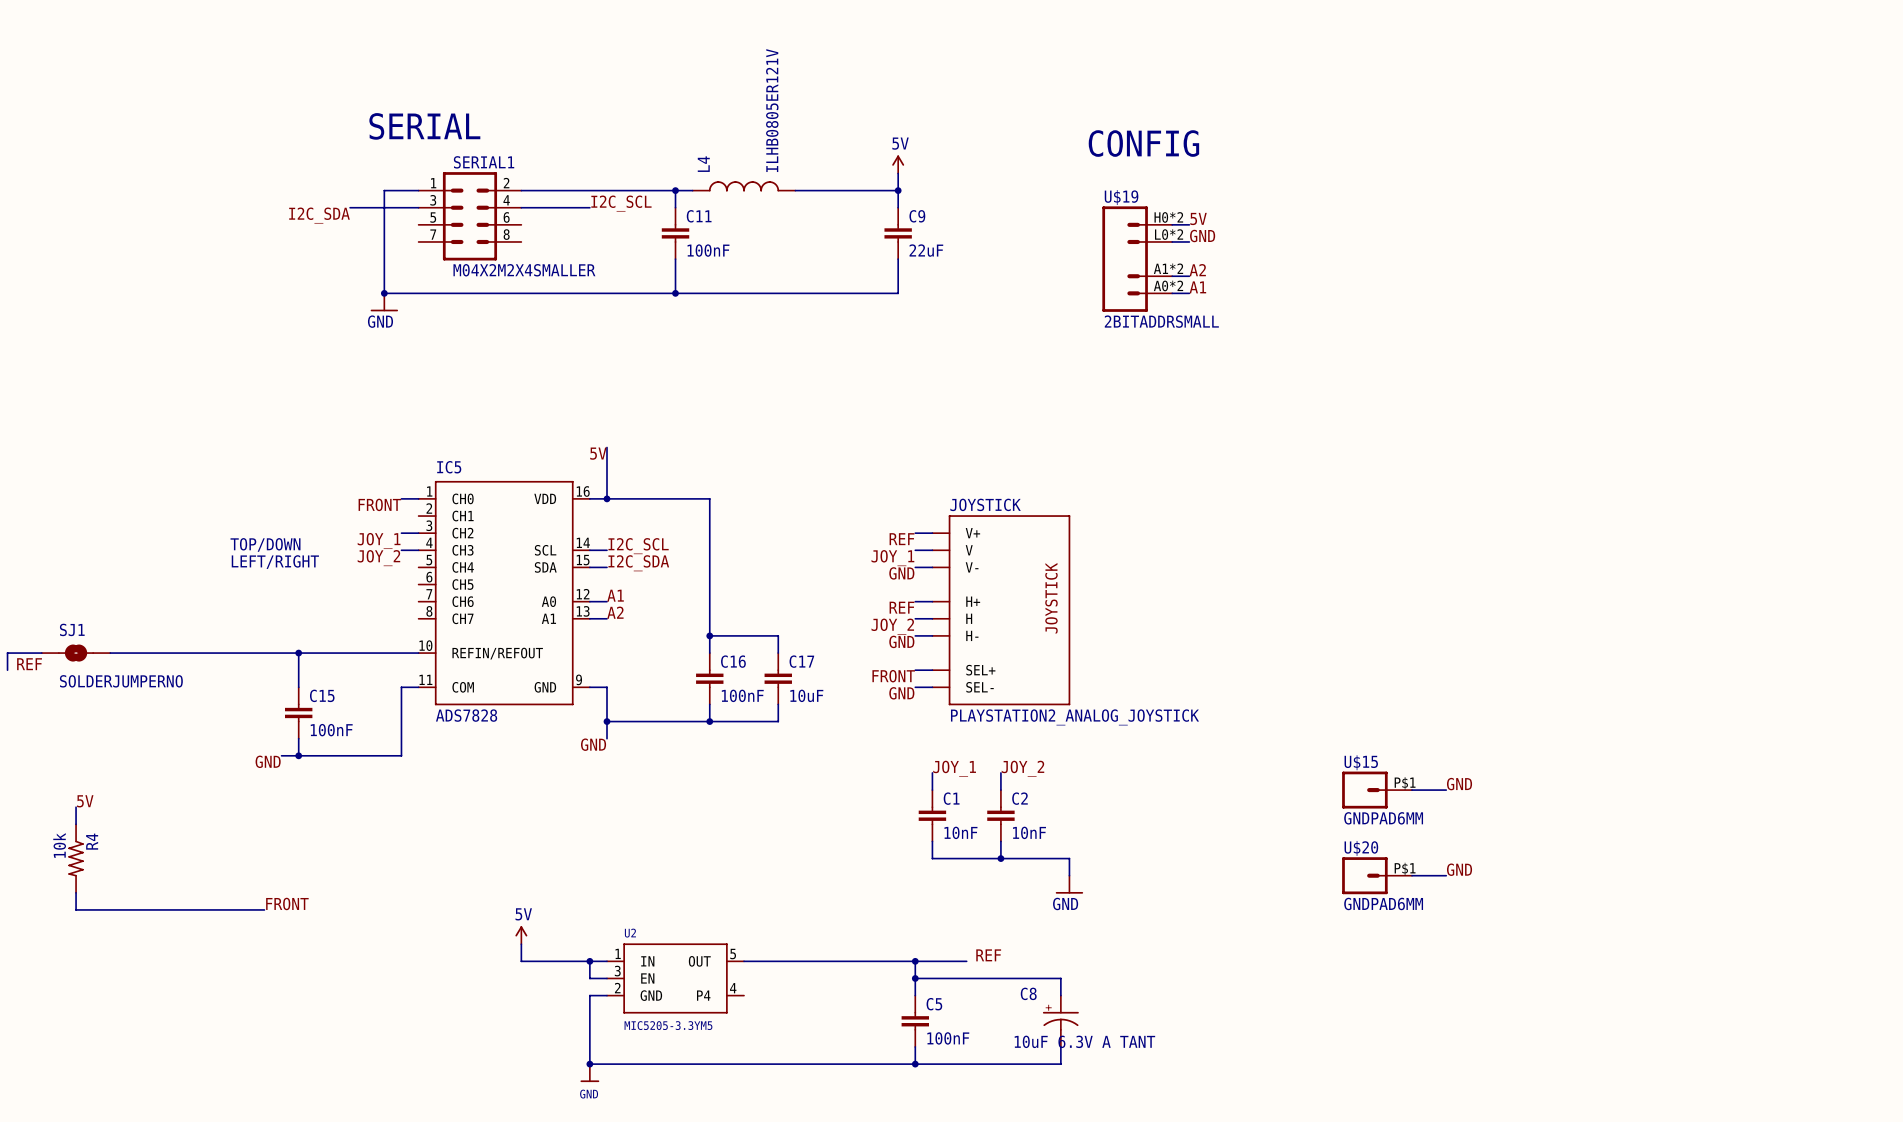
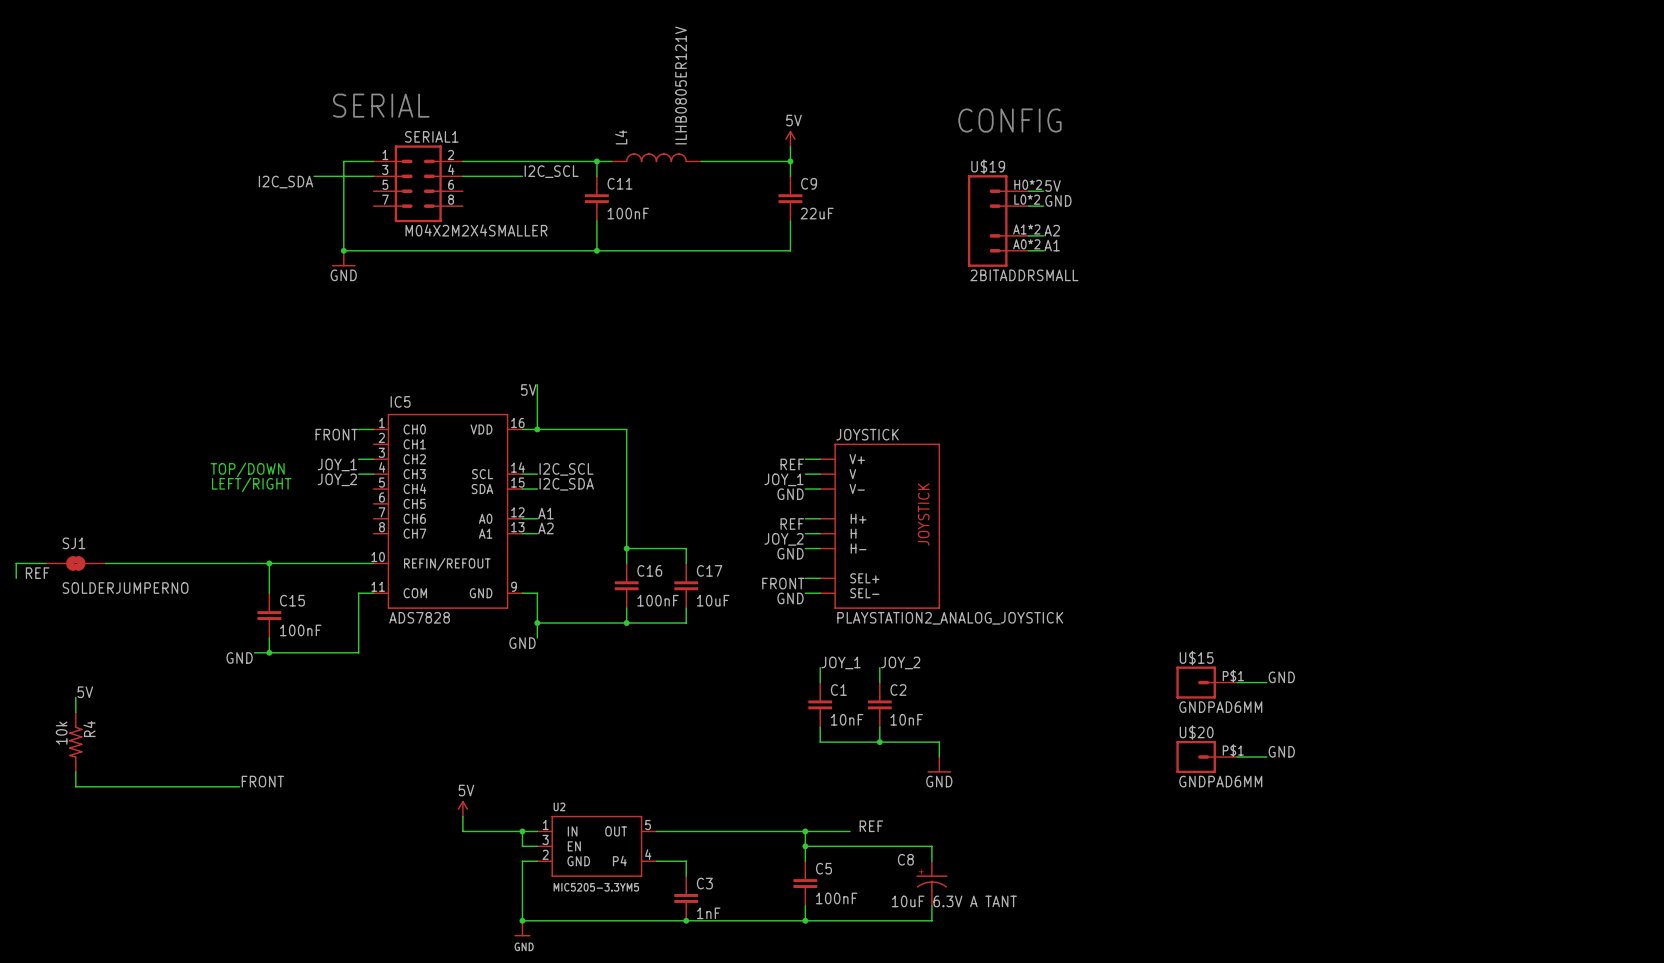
wire: none -> (656, 861) (686, 861) (686, 876)
C3: none -> 1nF (686, 898)
junction: none -> (686, 920)

